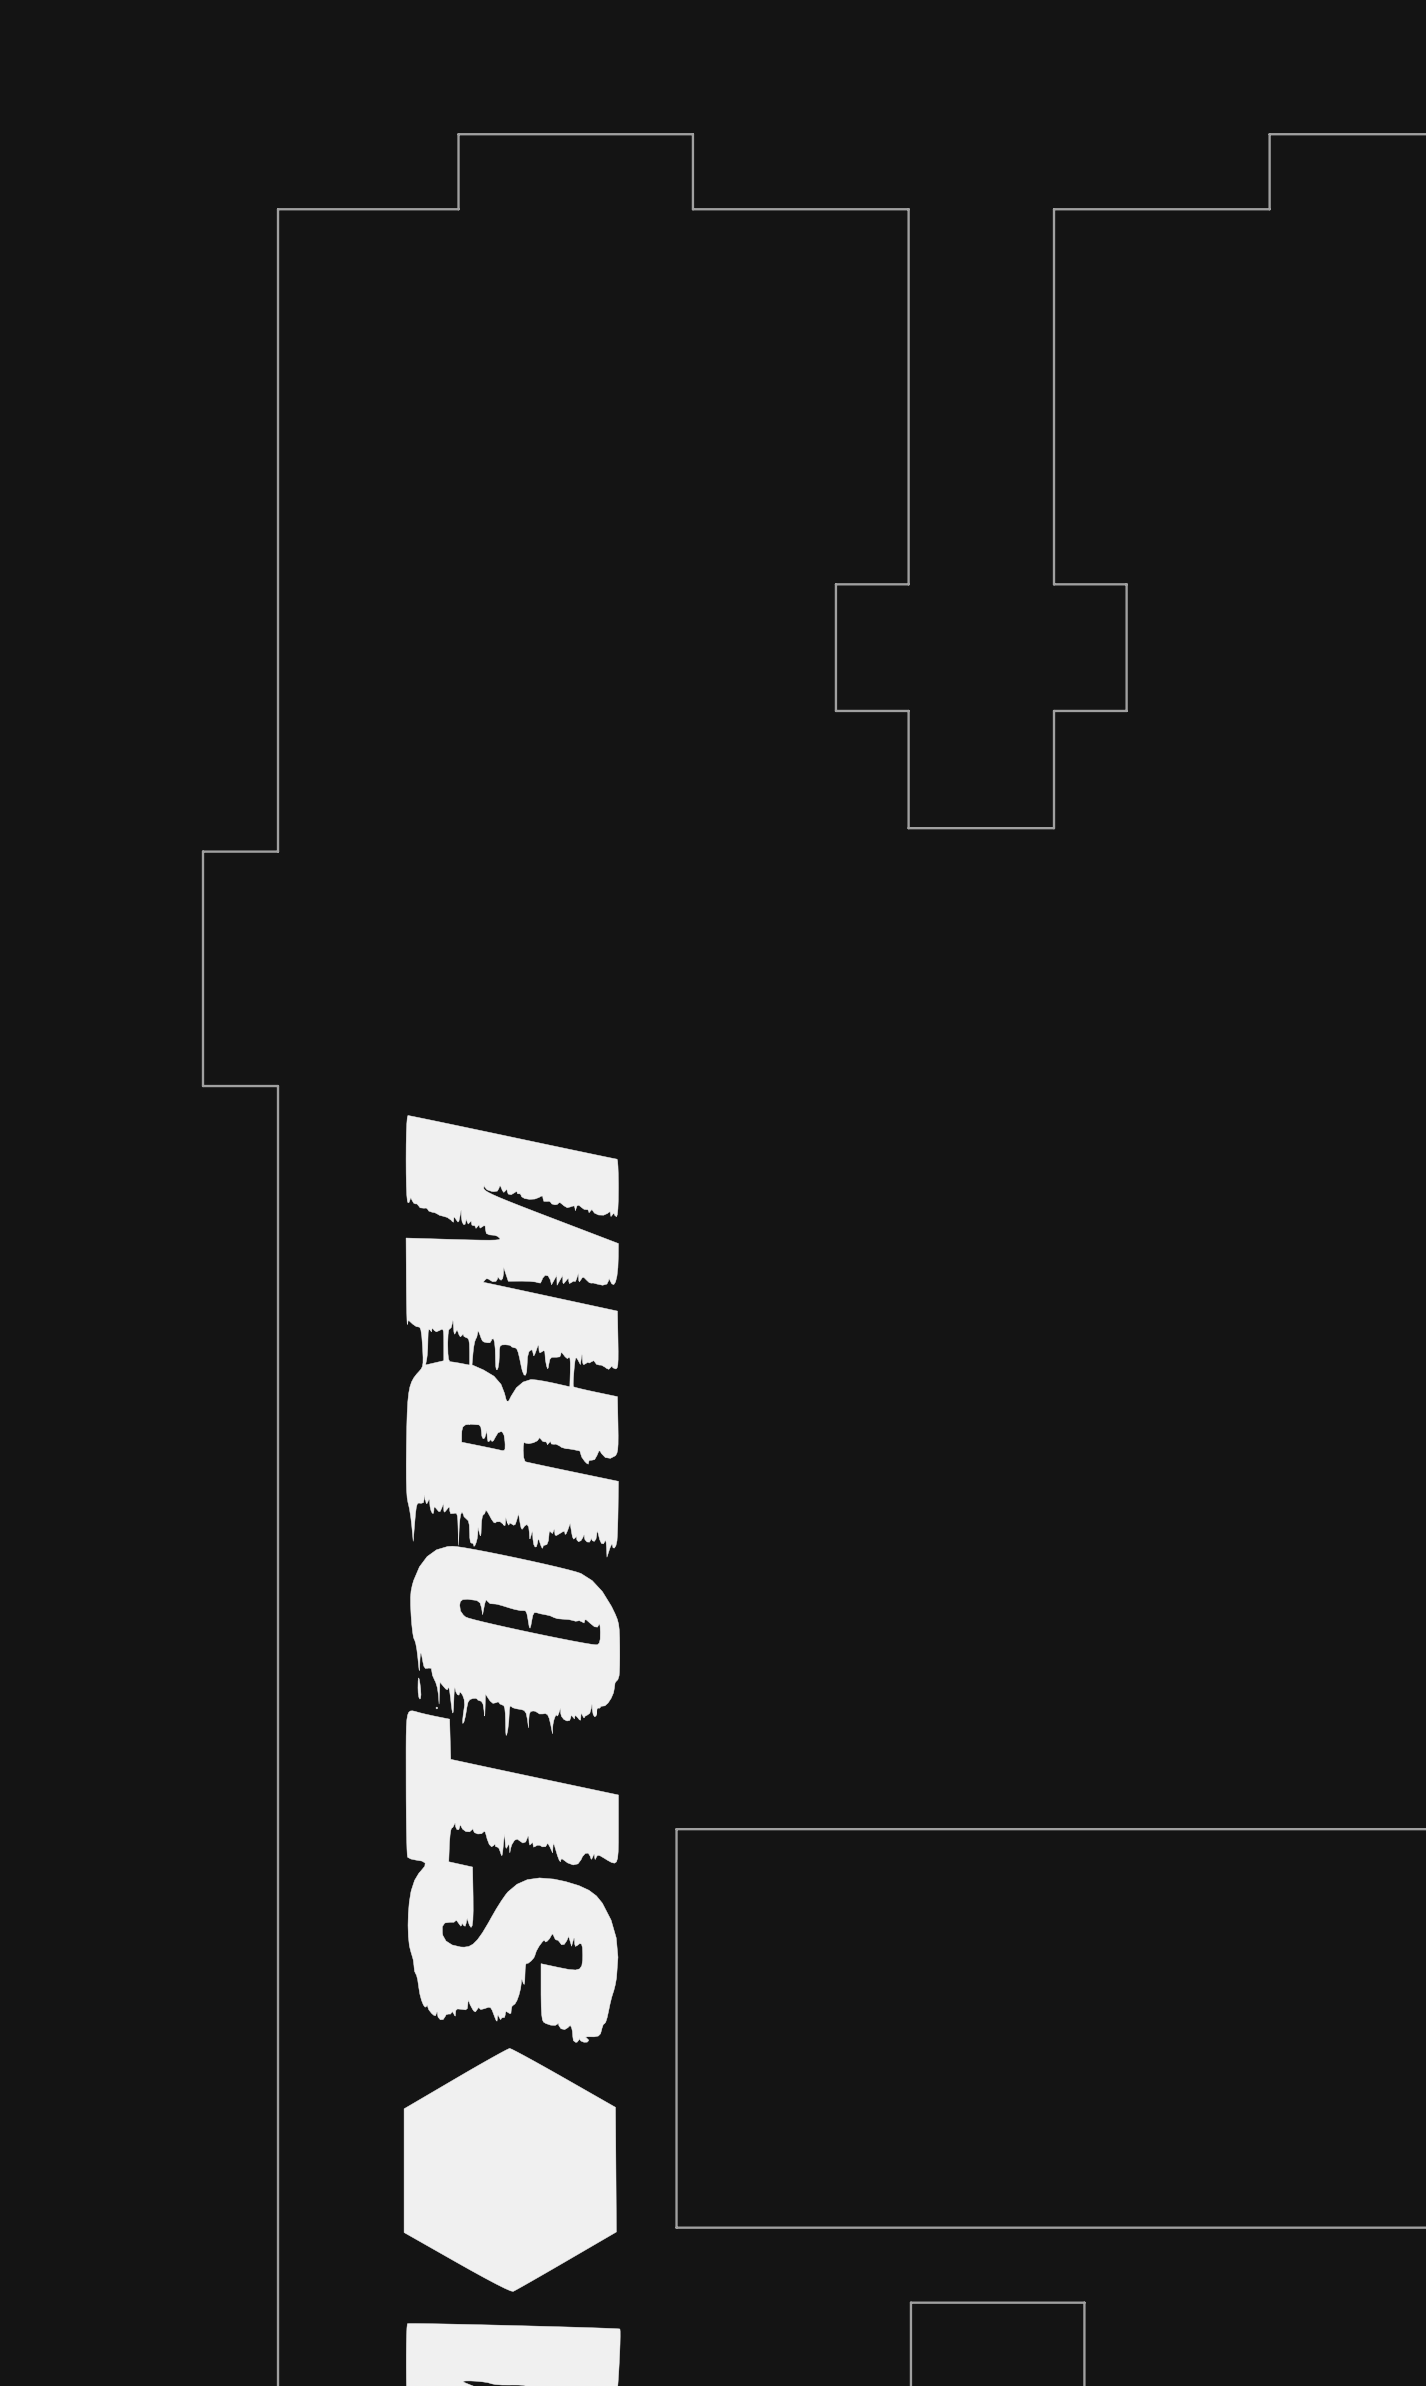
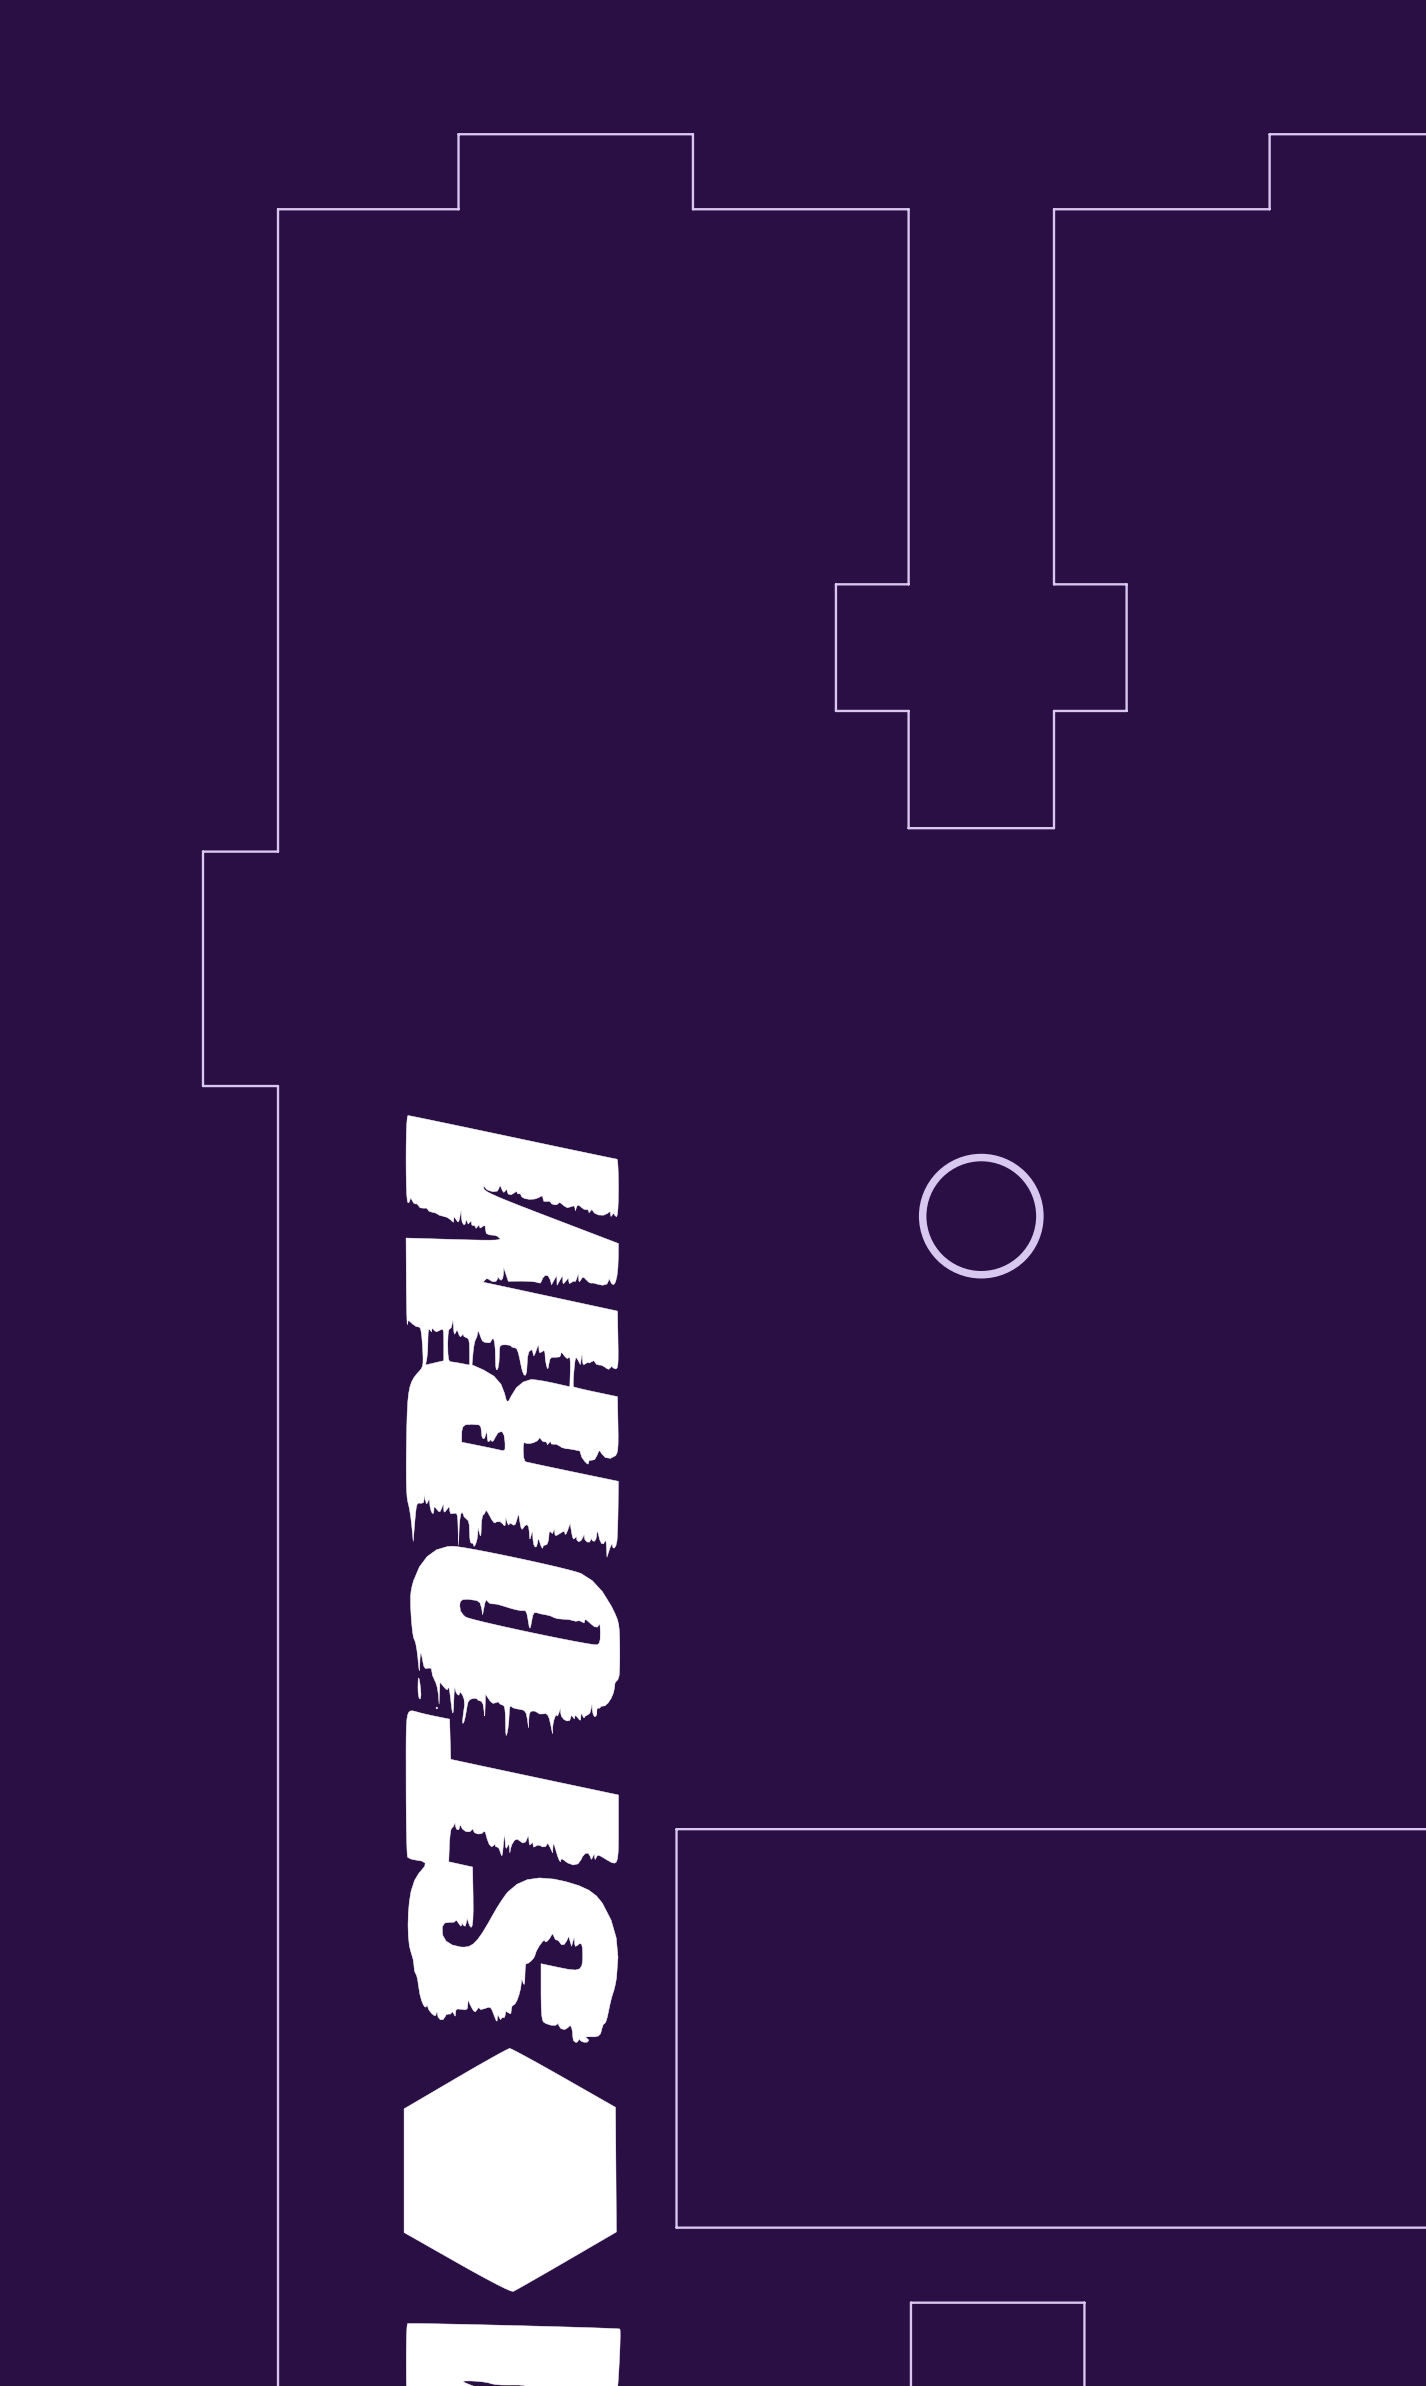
round board edge: none -> [918, 1153, 1044, 1279]

